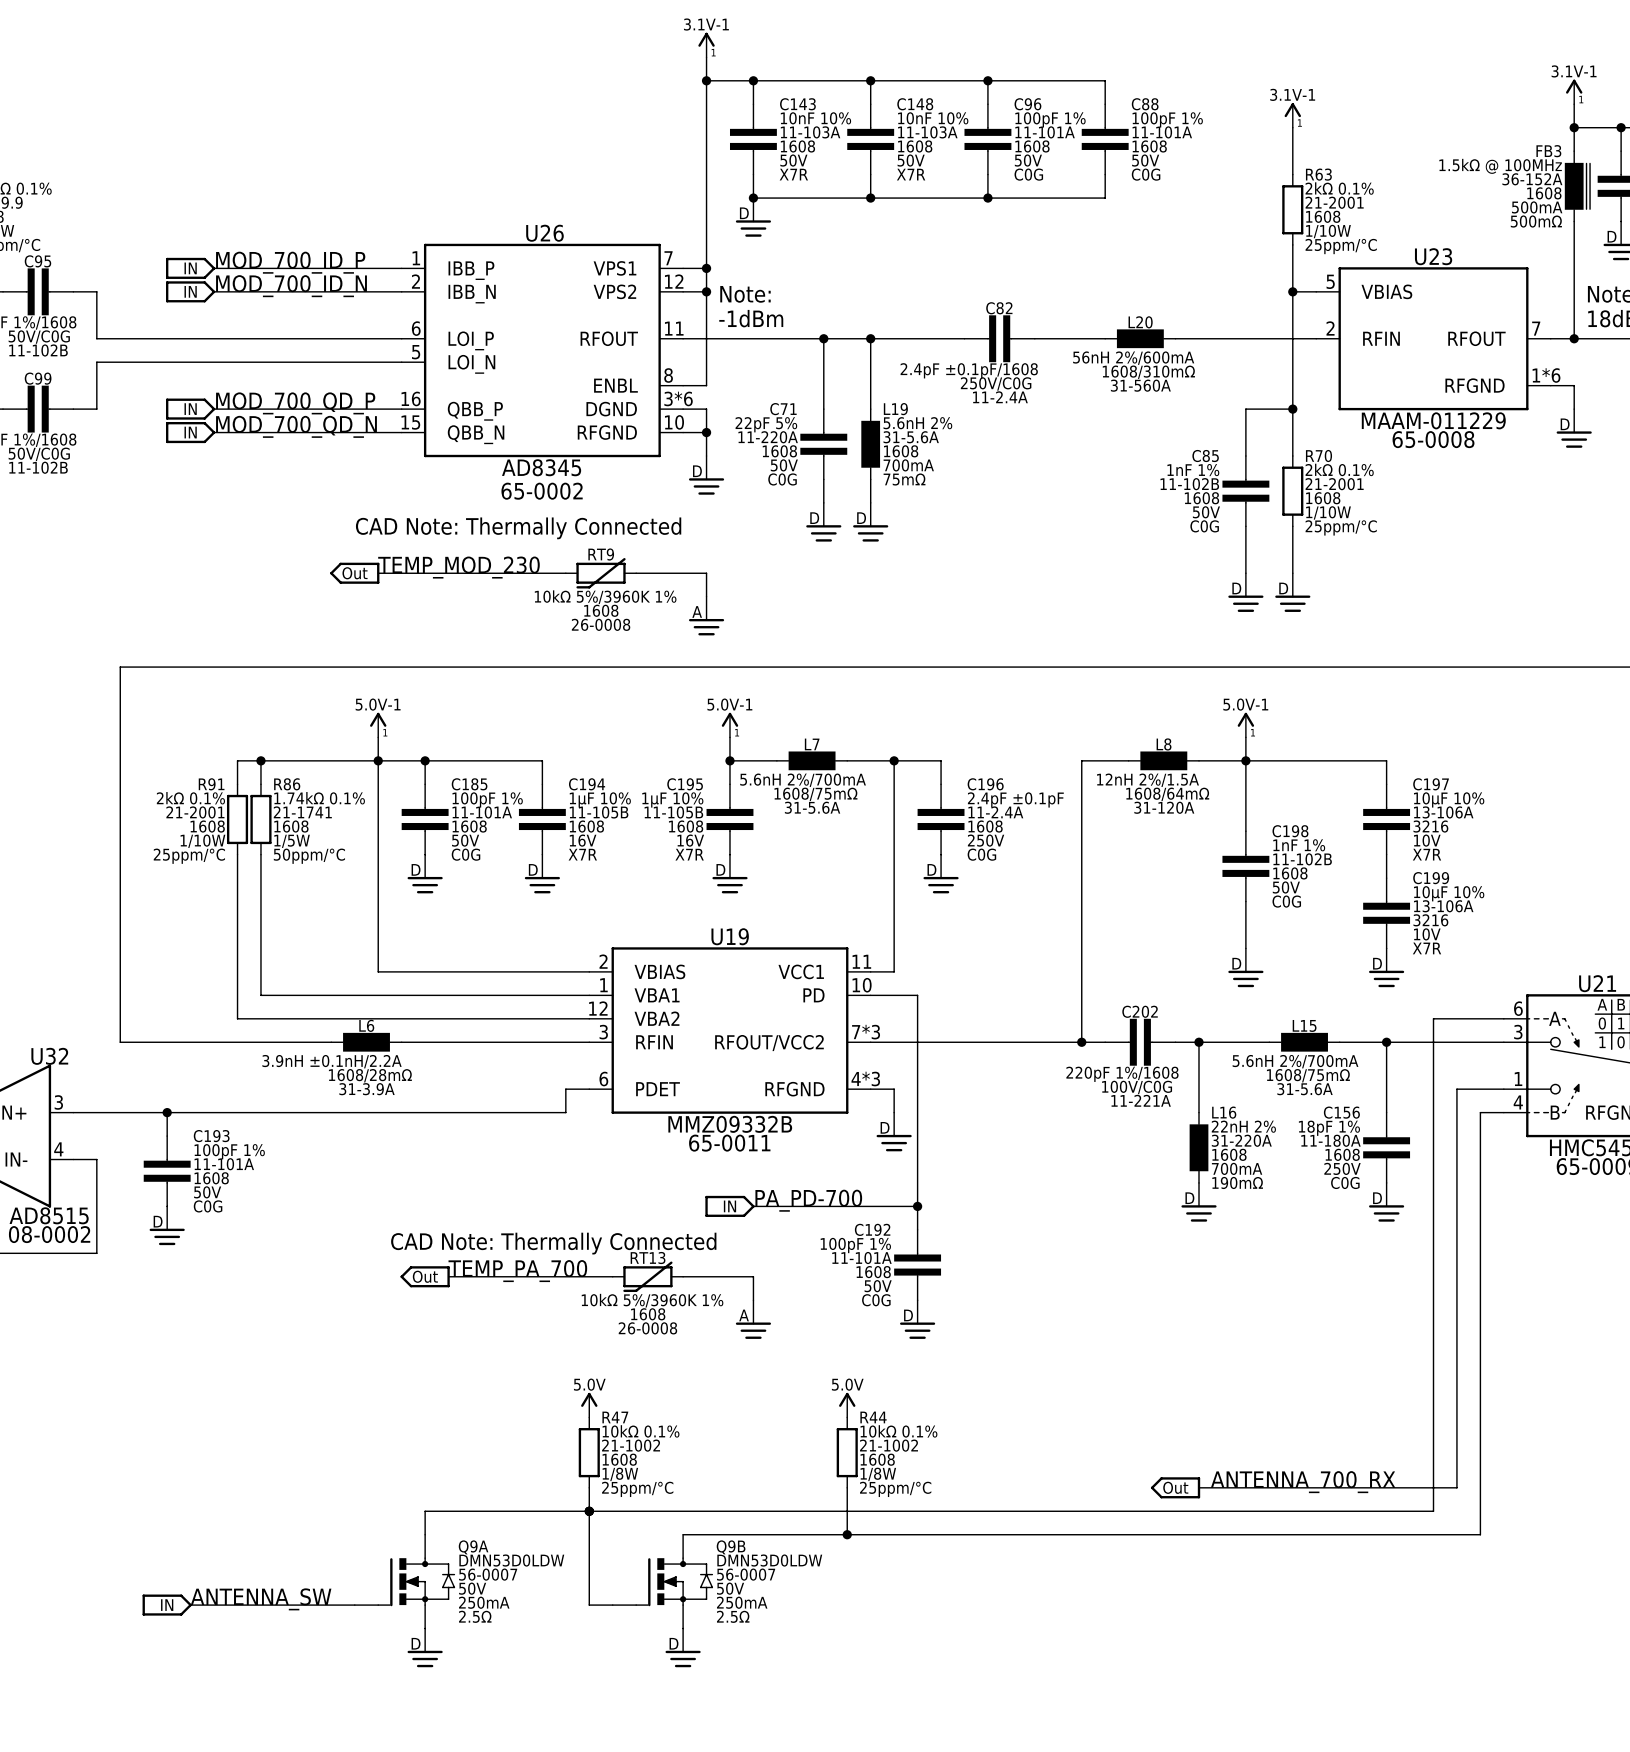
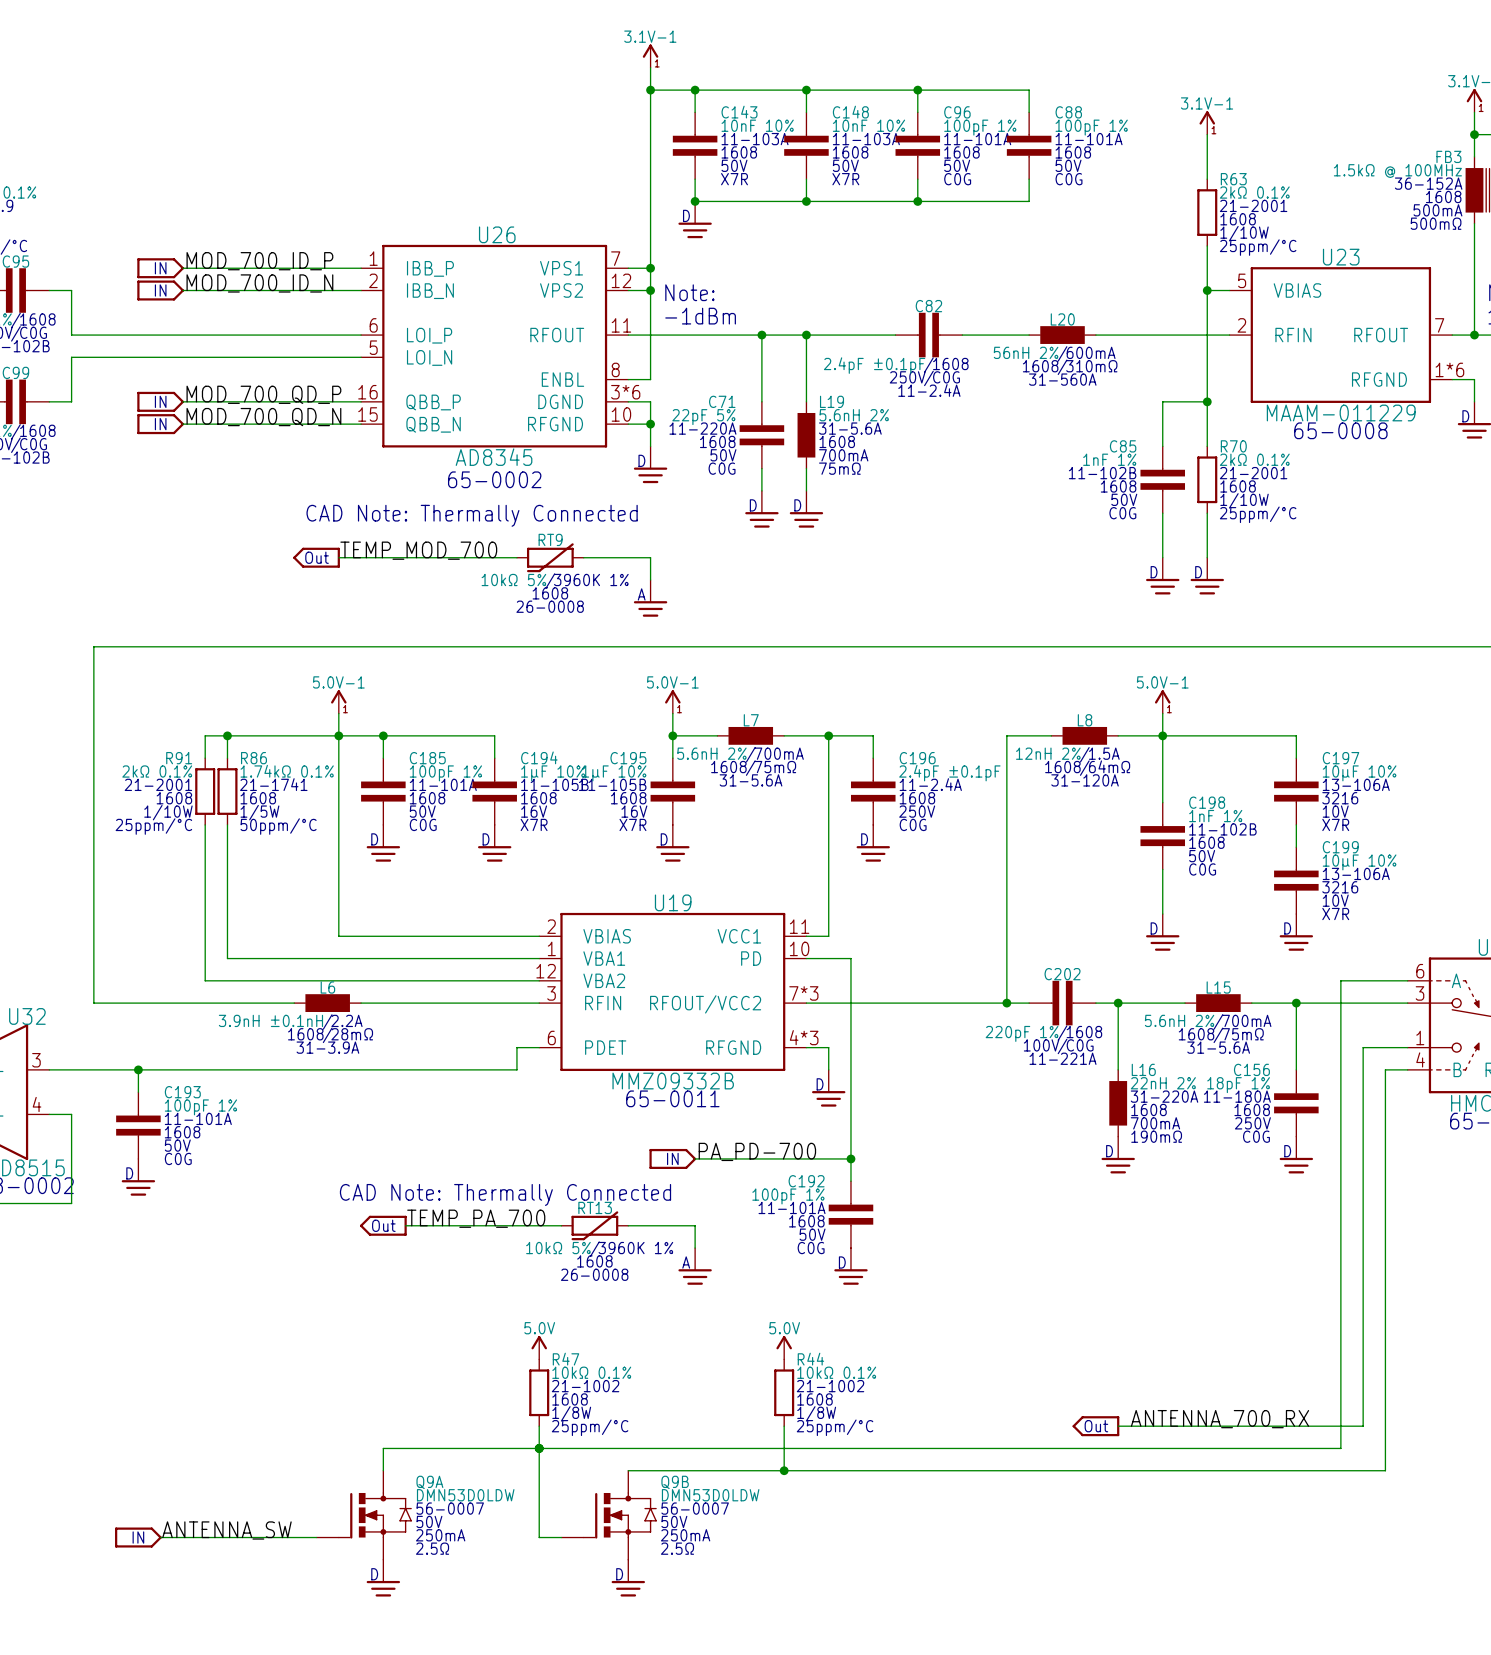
label: TEMP_MOD_230 (458, 567) -> TEMP_MOD_700 (418, 550)

